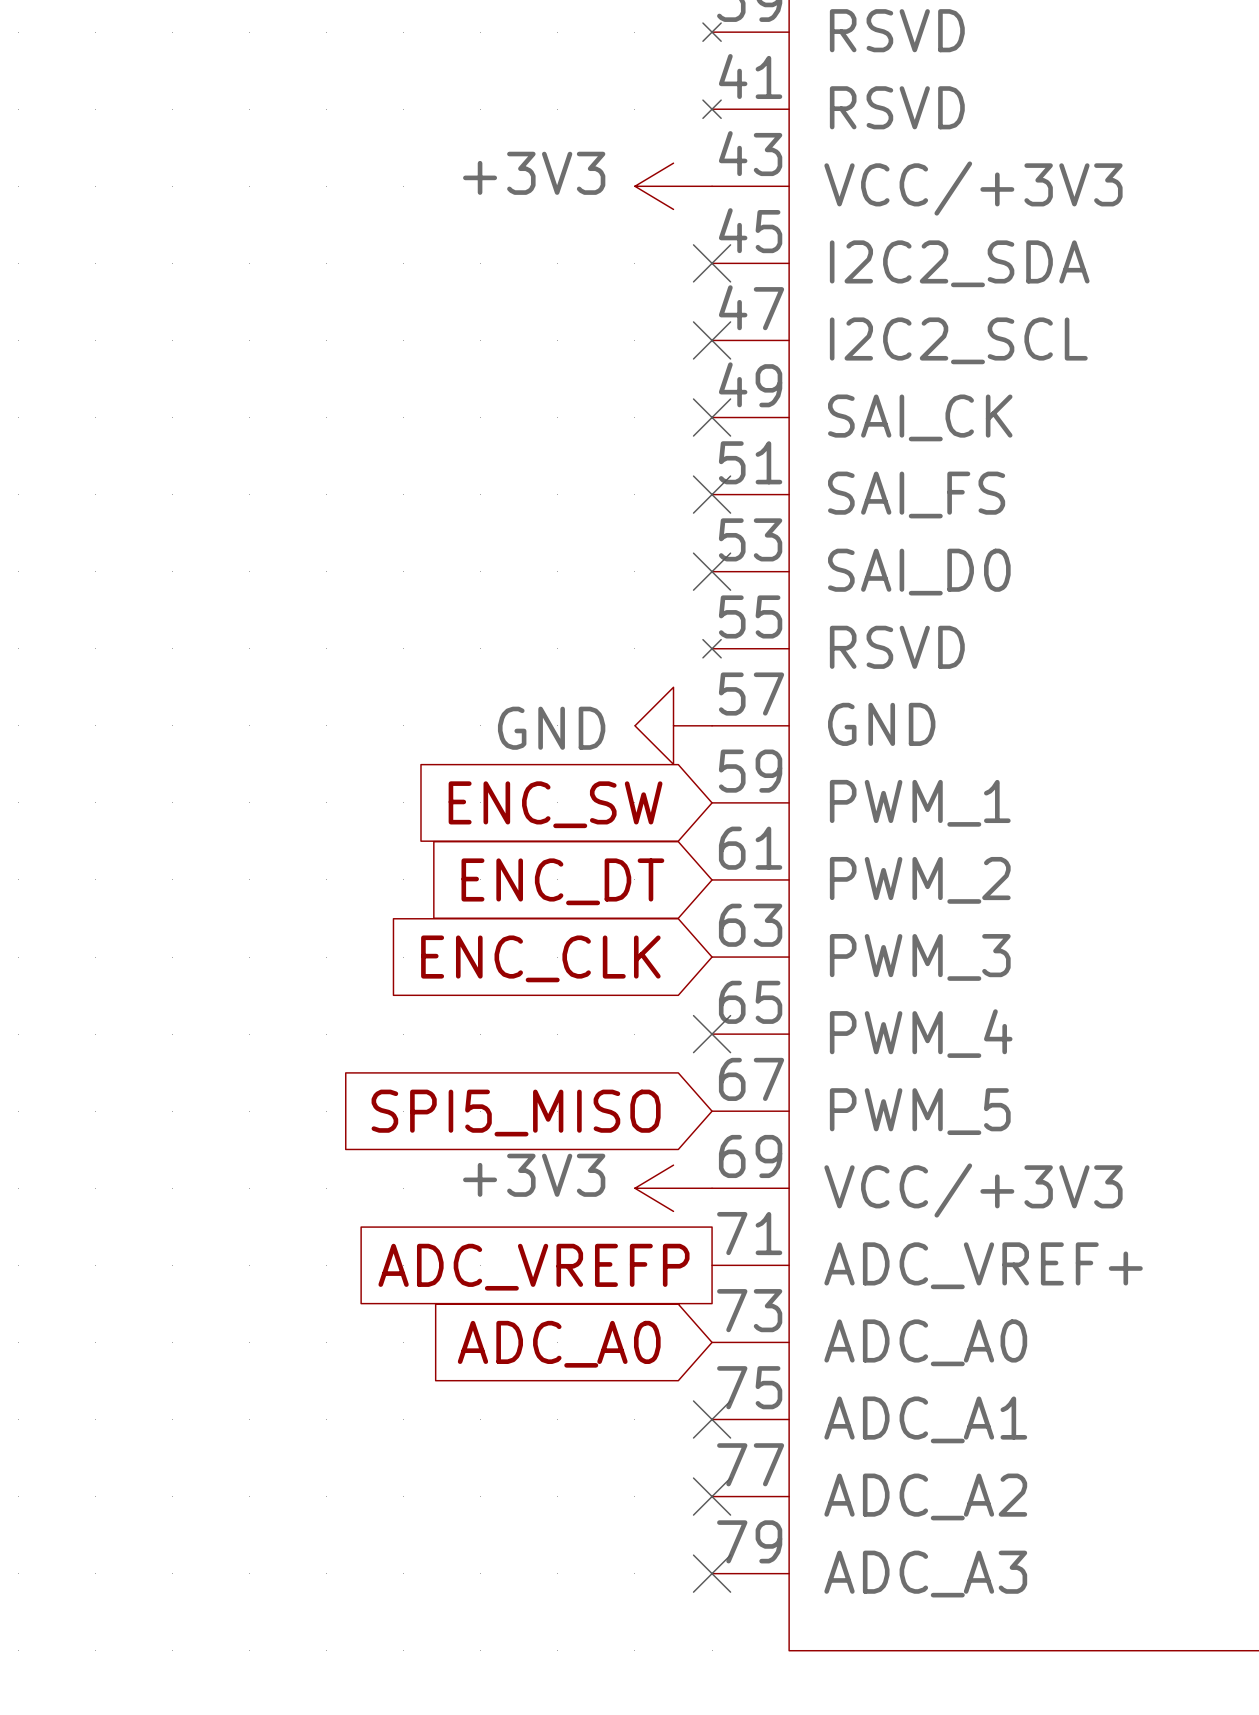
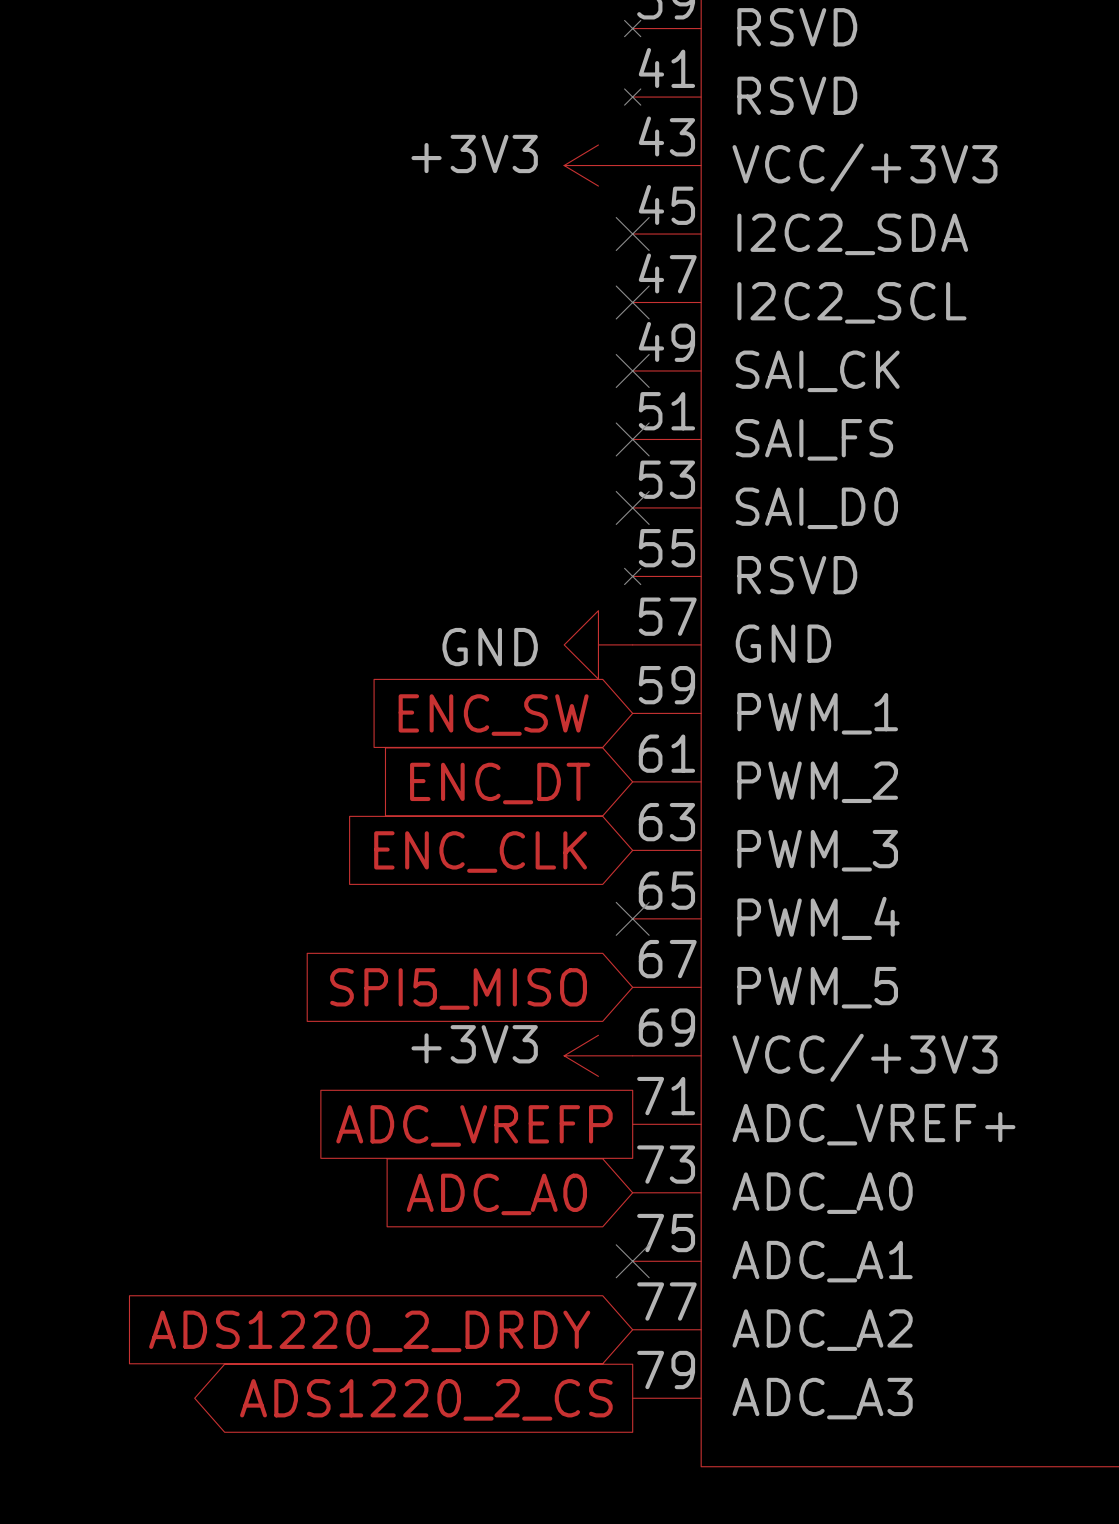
no-connect mark: (712, 1496) -> none
global label: none -> ADS1220_2_DRDY (369, 1331)
no-connect mark: (712, 1573) -> none
global label: none -> ADS1220_2_CS (426, 1399)

